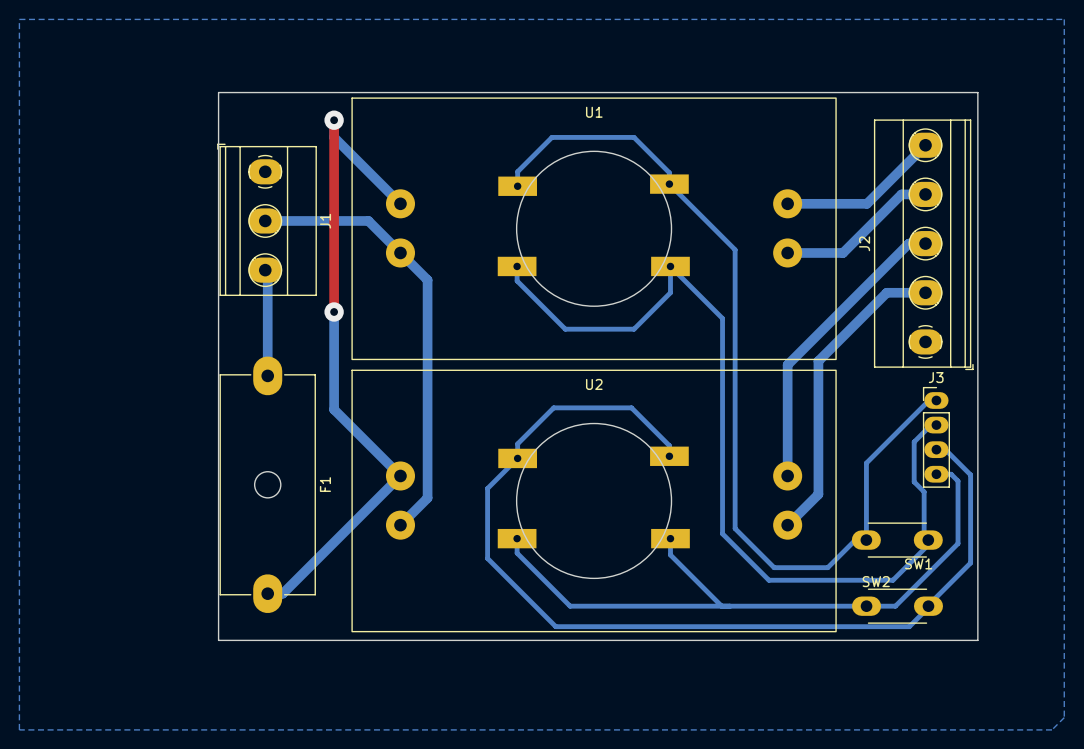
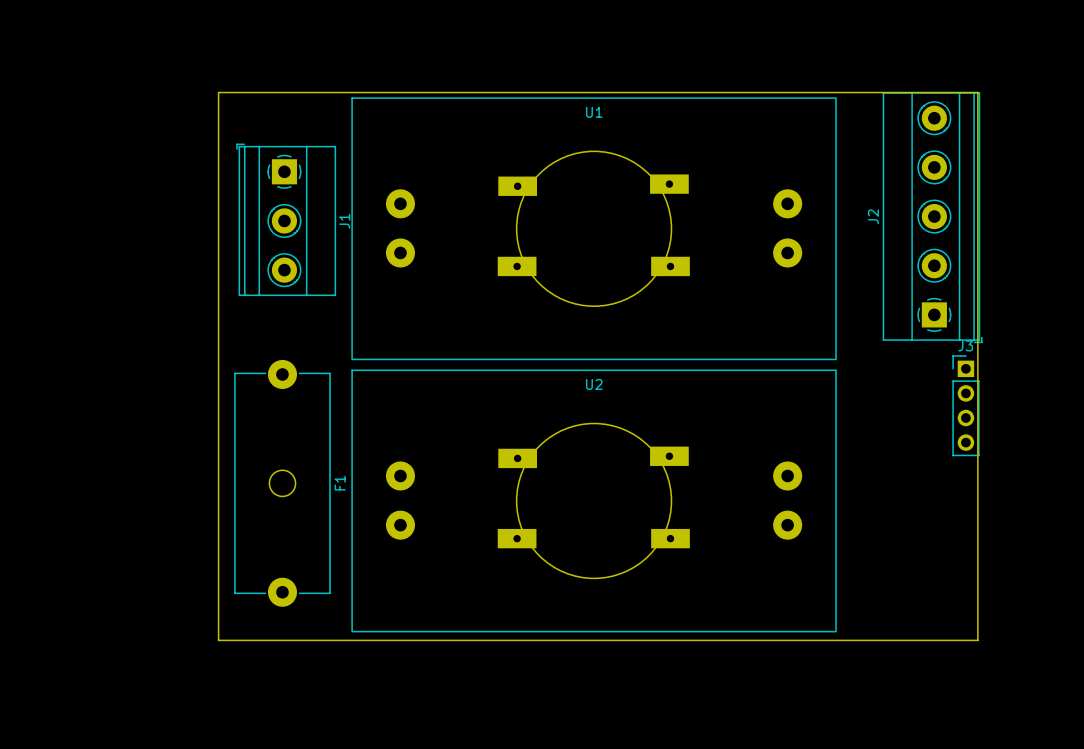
bottom zone outline: (19, 19) (1064, 19) (1064, 717) (1051, 729) (19, 729) (19, 19) -> none
J2 footprint: [874, 119, 974, 371] -> [882, 92, 983, 343]
bottom track: (334, 120) (334, 137) (400, 203) -> none
top track: (334, 120) (334, 311) -> none
via: (334, 120) -> none
J1 footprint: [217, 143, 317, 296] -> [236, 143, 336, 296]
bottom track: (925, 145) (866, 203) (787, 203) -> none
bottom track: (517, 186) (517, 171) (551, 137) (634, 137) (669, 172) (669, 184) (735, 249) (735, 528) (774, 567) (827, 567) (855, 540) (866, 540) (866, 463) (929, 400) (936, 400) -> none
bottom track: (925, 194) (901, 194) (843, 252) (787, 252) -> none
bottom track: (265, 220) (368, 220) (427, 280) (427, 498) (400, 525) -> none
bottom track: (925, 243) (908, 243) (787, 364) (787, 475) -> none
bottom track: (517, 266) (517, 280) (565, 329) (634, 329) (670, 292) (670, 266) (722, 318) (722, 533) (768, 580) (892, 580) (928, 544) (928, 540) (924, 535) (924, 491) (914, 481) (914, 441) (931, 425) (936, 425) -> none
bottom track: (265, 270) (267, 272) (267, 375) -> none
bottom track: (925, 292) (886, 292) (818, 361) (818, 494) (787, 525) -> none
bottom track: (334, 311) (334, 409) (400, 475) (282, 593) (267, 593) -> none
via: (334, 311) -> none
F1 footprint: [219, 356, 316, 614] -> [234, 359, 331, 607]
J3 footprint: [922, 387, 950, 488] -> [952, 355, 980, 457]
bottom track: (936, 449) (945, 449) (970, 474) (970, 563) (909, 626) (555, 626) (487, 558) (487, 488) (517, 458) (517, 443) (553, 407) (631, 407) (669, 445) (669, 456) -> none
bottom track: (936, 474) (951, 474) (958, 481) (958, 543) (895, 606) (570, 606) (517, 553) (517, 538) -> none
bottom track: (670, 538) (670, 554) (721, 606) -> none
SW1: (897, 540) -> none
SW2: (897, 606) -> none

